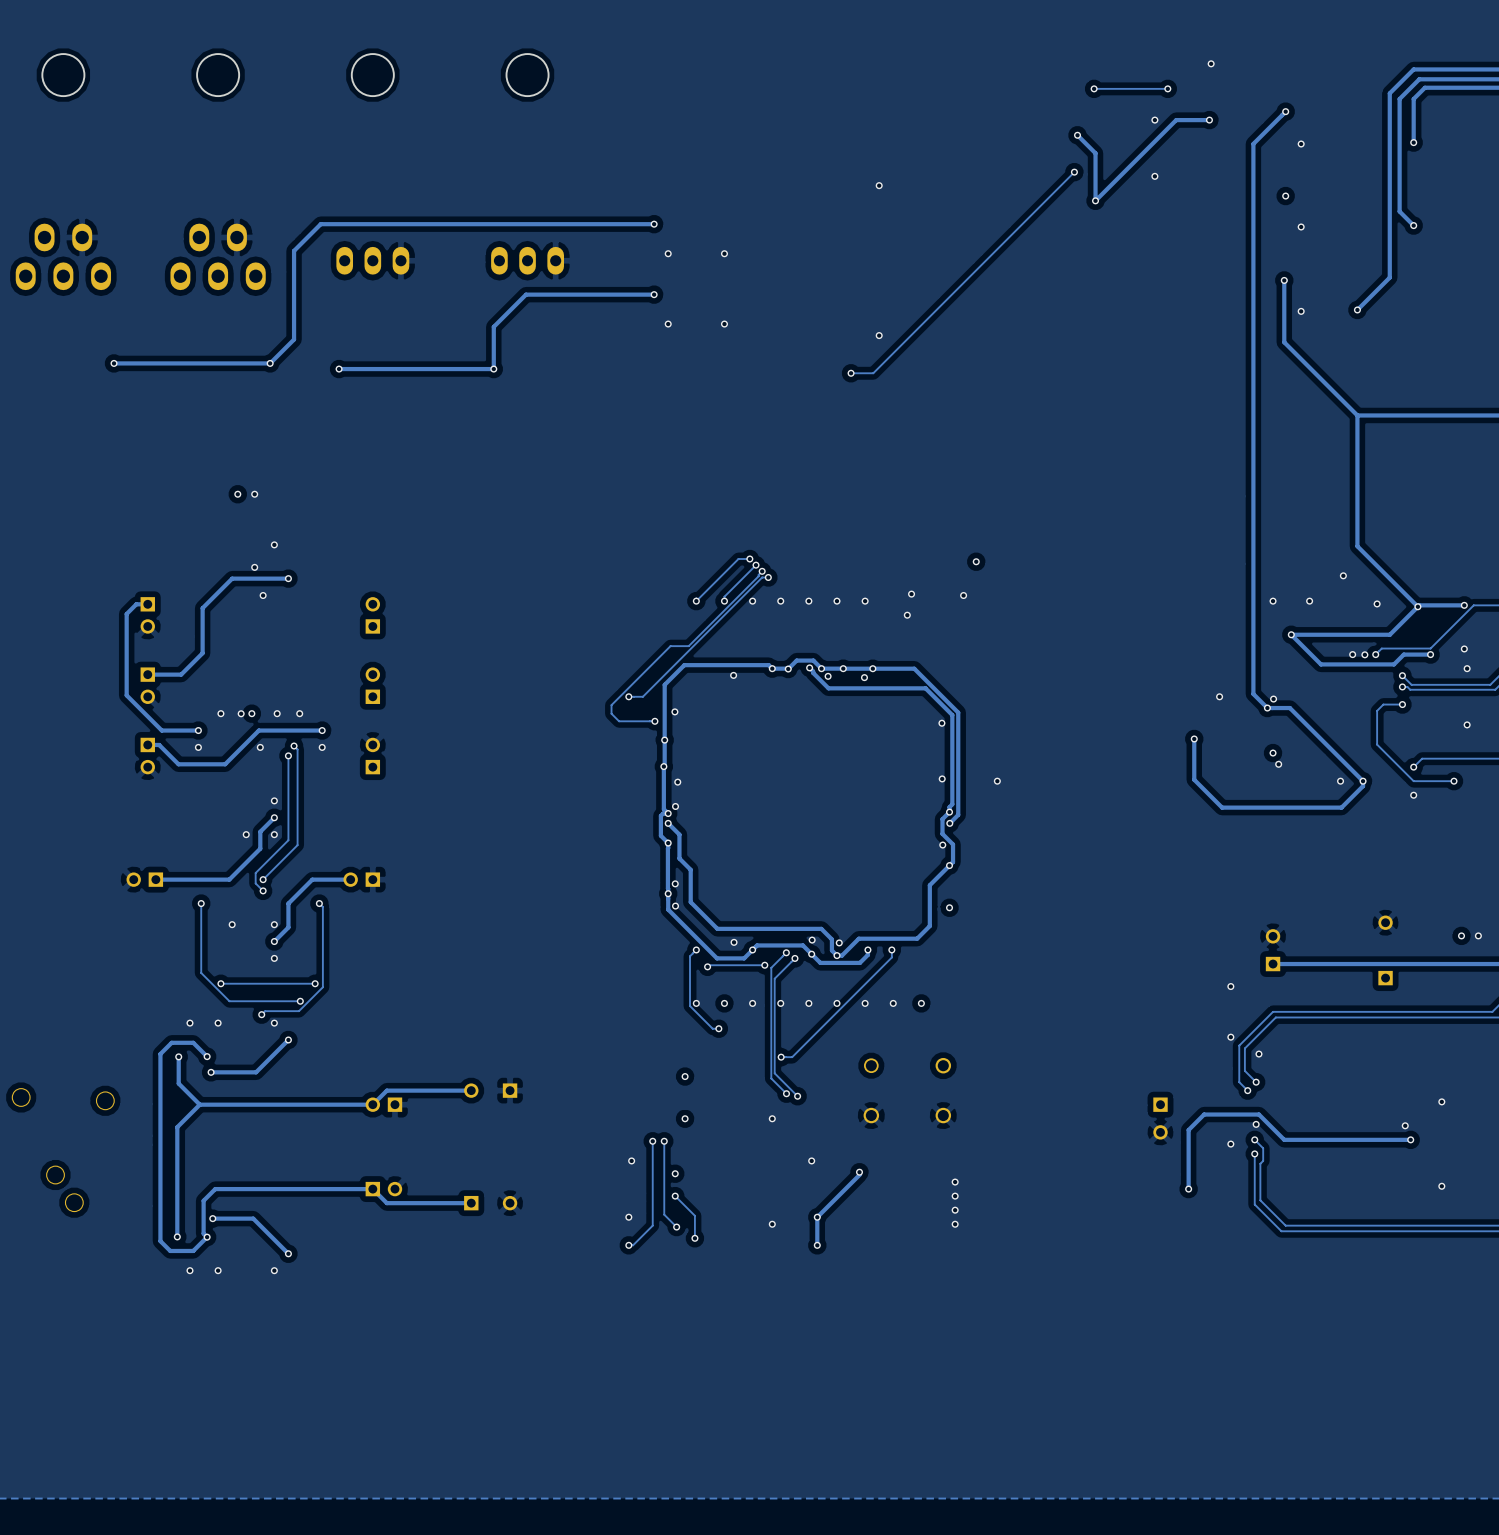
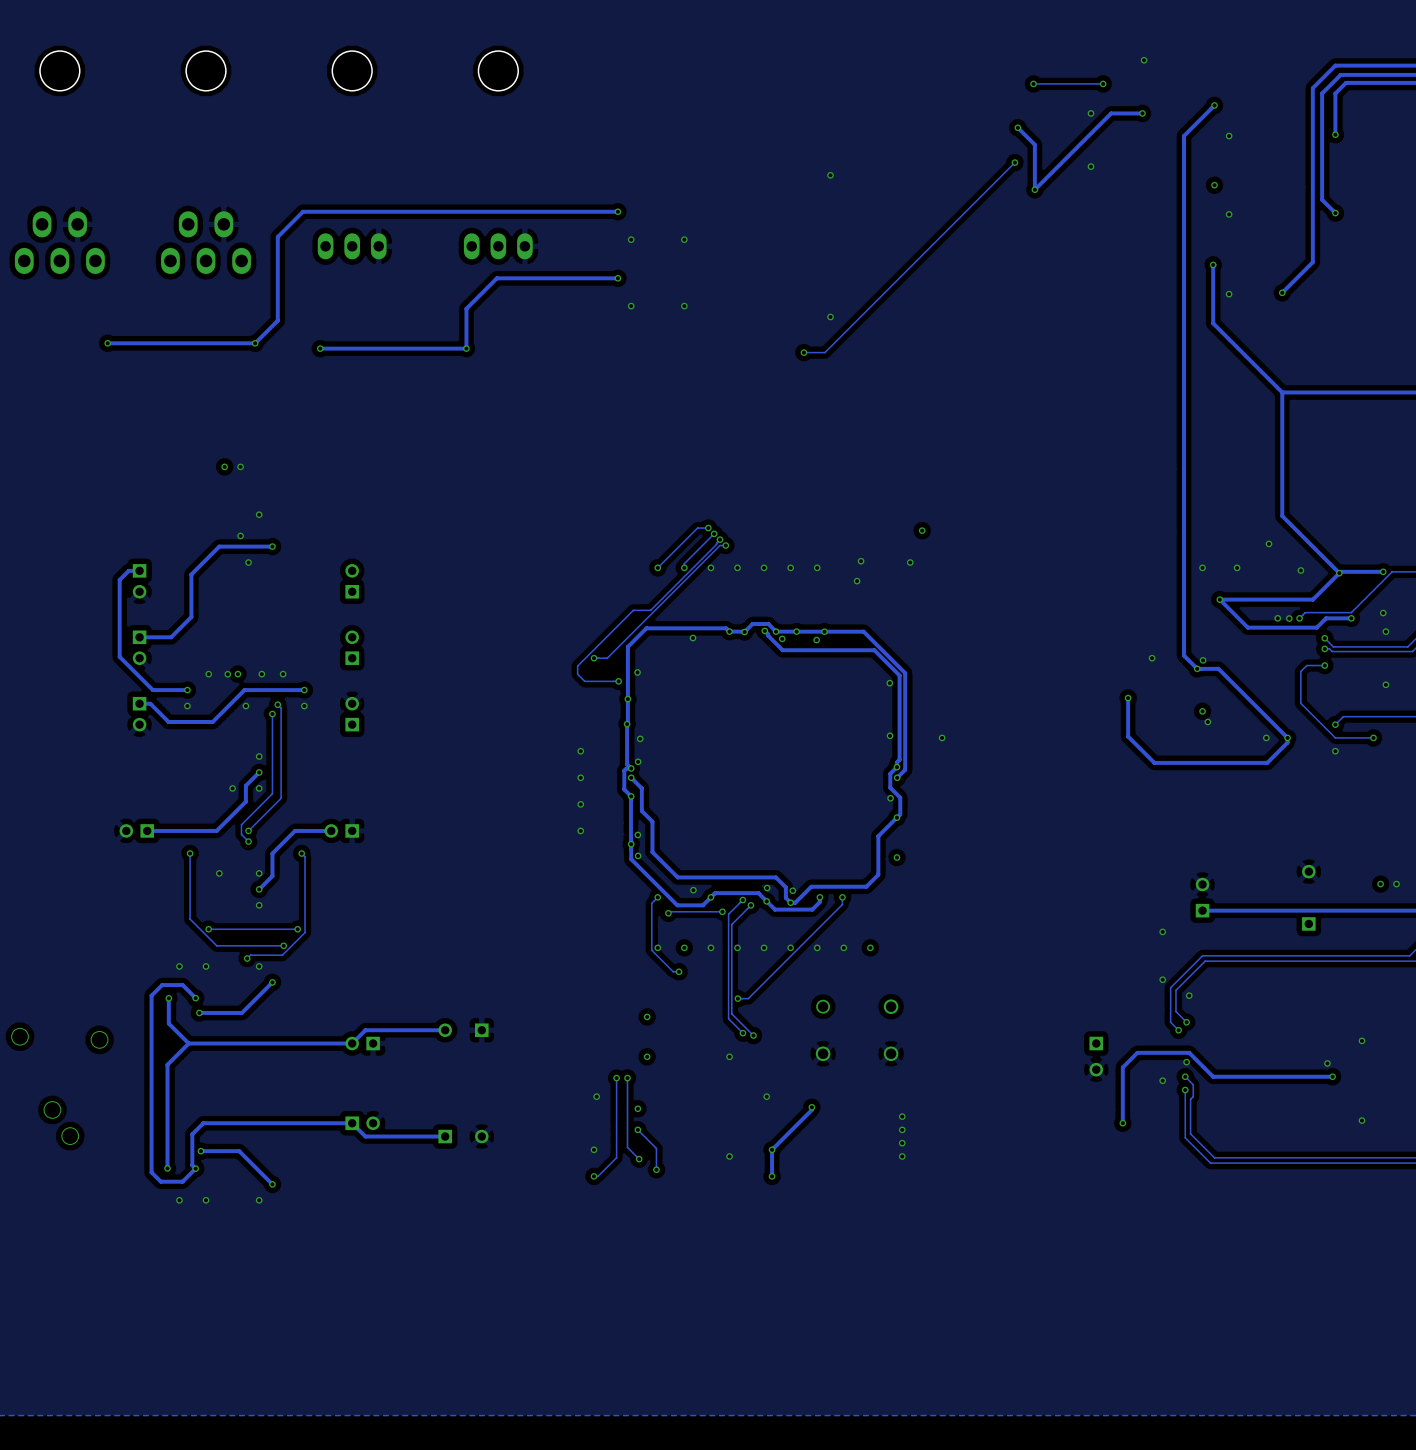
via: none -> (580, 751)
via: none -> (580, 777)
via: none -> (580, 804)
via: none -> (580, 830)

